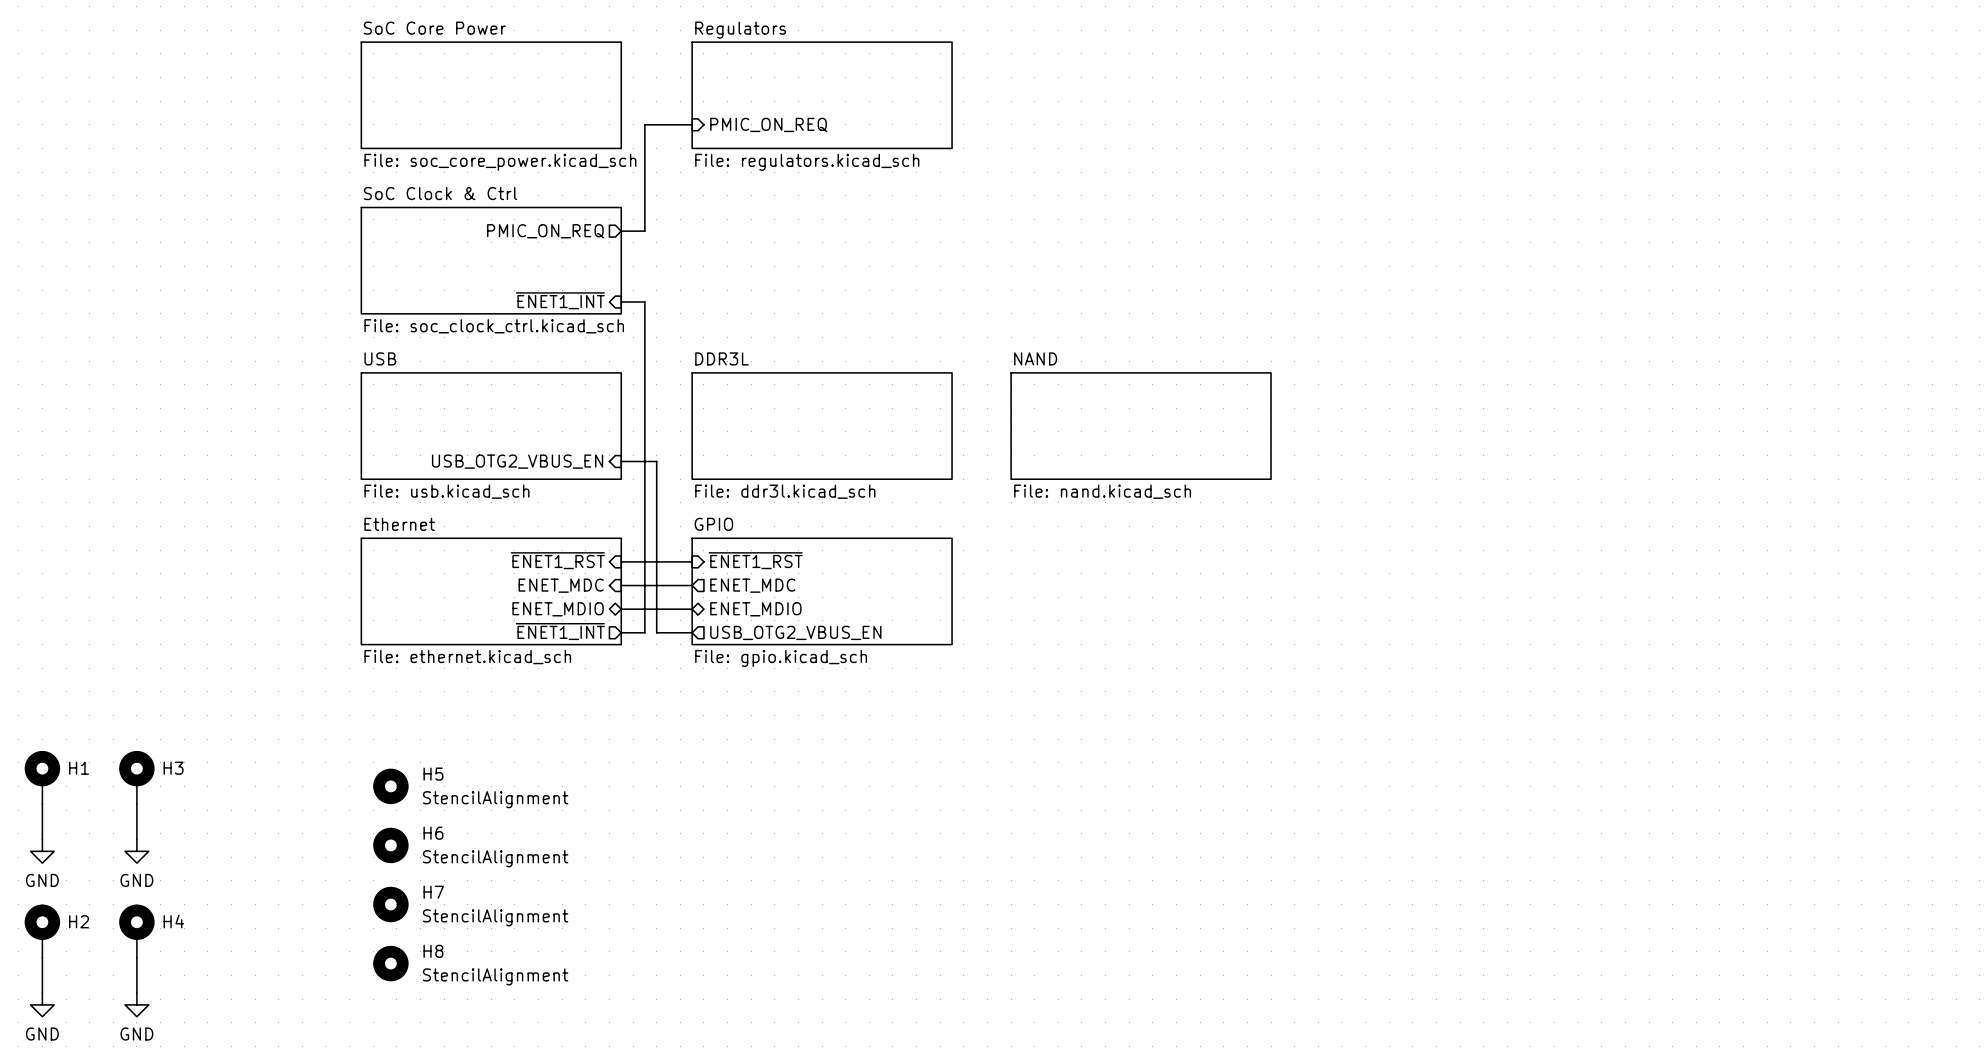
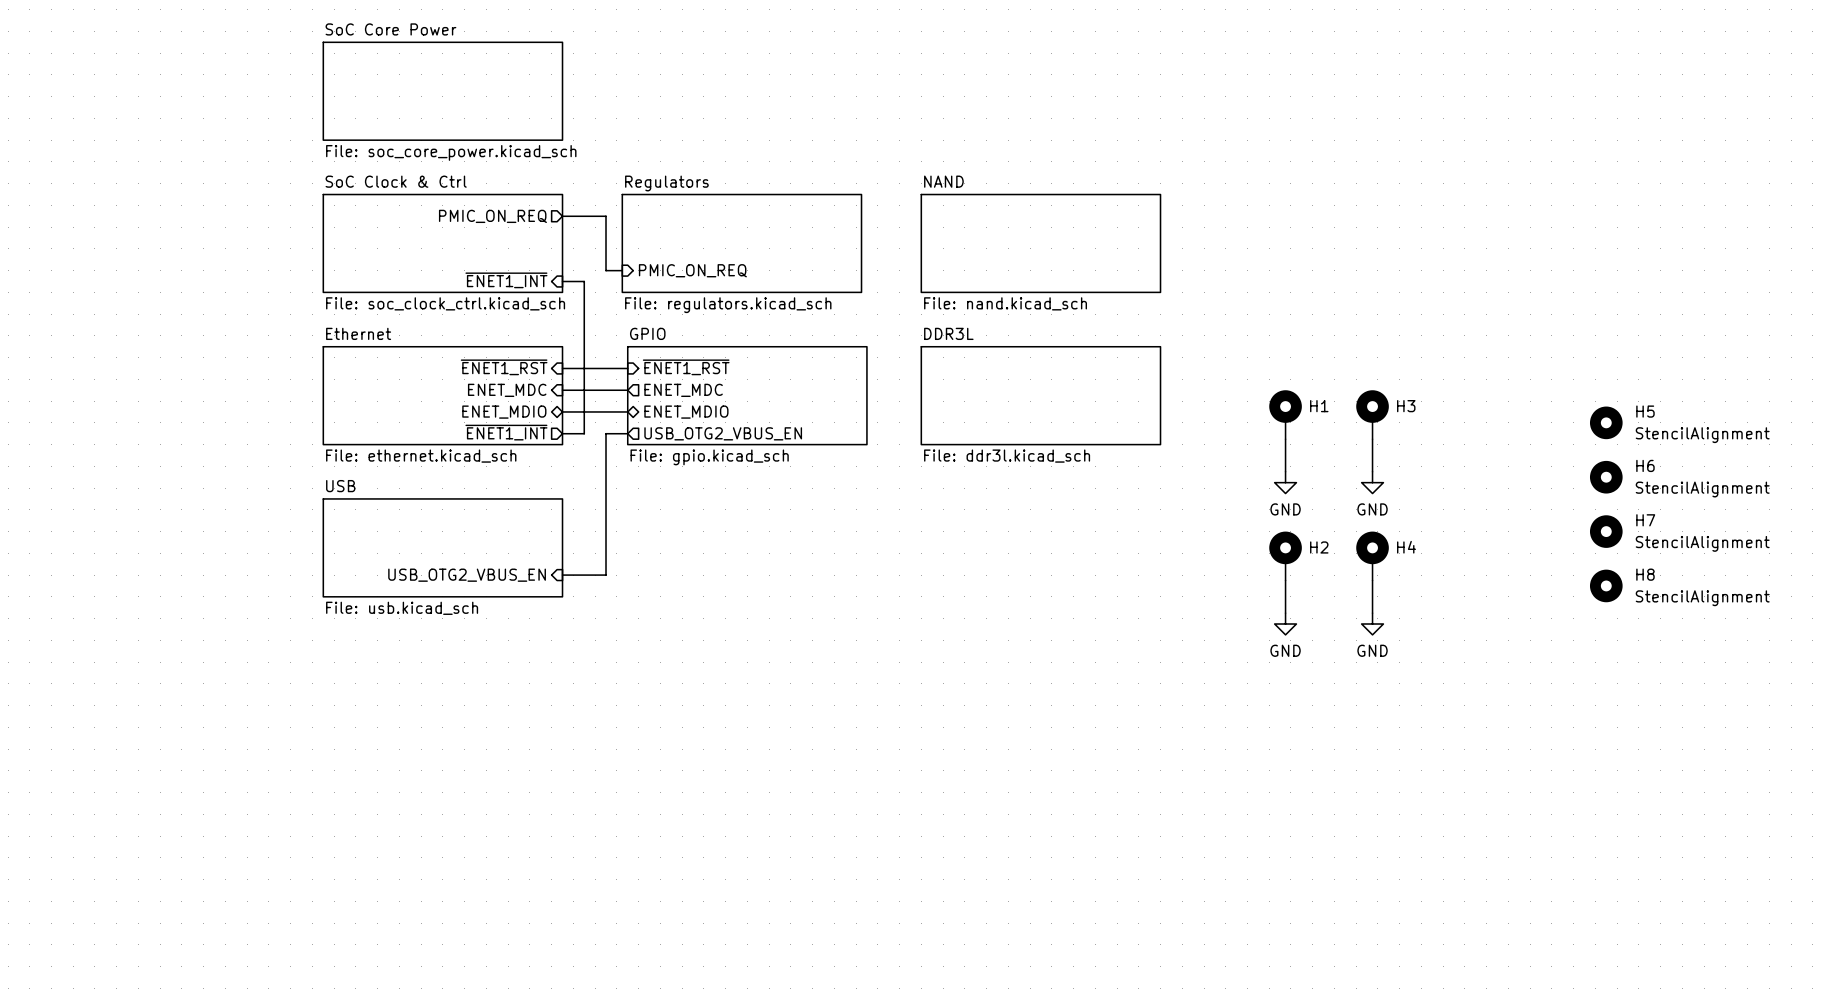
sheet Regulators position: (822, 95) -> (741, 243)
wire: (692, 124) (644, 124) (644, 231) -> (622, 270) (606, 270) (606, 216) (584, 216)
sheet pin position: PMIC_ON_REQ (768, 124) -> PMIC_ON_REQ (692, 270)
sheet NAND: none -> File: nand.kicad_sch (1040, 243)
sheet USB name: USB (380, 358) -> Ethernet (358, 333)
sheet DDR3L name: DDR3L (722, 358) -> GPIO (647, 333)
sheet NAND name: NAND (1035, 358) -> DDR3L (948, 333)
sheet pin: none -> ~{ENET1_RST} (504, 367)
sheet pin: none -> ~{ENET1_RST} (686, 367)
sheet pin: none -> ENET_MDC (507, 390)
sheet pin: none -> ENET_MDC (683, 390)
sheet pin: none -> ENET_MDIO (504, 412)
sheet pin: none -> ENET_MDIO (686, 412)
sheet pin: USB_OTG2_VBUS_EN (517, 461) -> none
wire: (621, 461) (656, 461) (656, 632) (692, 632) -> none
wire: (644, 467) (644, 632) (621, 632) -> (584, 433) (562, 433)
wire: none -> (627, 433) (606, 433) (606, 575) (562, 575)
sheet pin: none -> USB_OTG2_VBUS_EN (723, 433)
wire: none -> (1285, 439) (1285, 471)
wire: none -> (1372, 439) (1372, 471)
sheet USB value: File: usb.kicad_sch (446, 491) -> File: ethernet.kicad_sch (421, 456)
sheet DDR3L value: File: ddr3l.kicad_sch (785, 491) -> File: gpio.kicad_sch (709, 457)
sheet NAND value: File: nand.kicad_sch (1102, 491) -> File: ddr3l.kicad_sch (1007, 456)
power symbol: none -> GND (1285, 482)
power symbol: none -> GND (1372, 482)
sheet Ethernet name: Ethernet (399, 524) -> USB (340, 486)
sheet pin: ~{ENET1_RST} (557, 560) -> none
sheet pin: ~{ENET1_RST} (755, 560) -> none
wire: (621, 561) (692, 561) -> (562, 368) (627, 368)
sheet pin: ENET_MDC (561, 585) -> none
wire: (621, 585) (692, 585) -> (562, 390) (627, 390)
sheet pin: ENET_MDC (752, 585) -> none
sheet GPIO: File: gpio.kicad_sch (822, 591) -> none
sheet pin: ENET_MDIO (558, 609) -> none
wire: (621, 609) (692, 609) -> (562, 411) (627, 411)
sheet pin: ENET_MDIO (755, 609) -> none
sheet pin: none -> USB_OTG2_VBUS_EN (467, 575)
wire: none -> (1285, 580) (1285, 613)
wire: none -> (1372, 580) (1372, 613)
sheet pin position: ~{ENET1_INT} (560, 631) -> ~{ENET1_INT} (506, 432)
sheet pin: USB_OTG2_VBUS_EN (795, 632) -> none
sheet Ethernet value: File: ethernet.kicad_sch (467, 657) -> File: usb.kicad_sch (402, 608)
power symbol: none -> GND (1285, 624)
power symbol: none -> GND (1372, 624)
H1 position: (42, 777) -> (1285, 414)
H3 position: (136, 777) -> (1372, 414)
H5 position: (390, 786) -> (1606, 422)
wire: (42, 804) (42, 839) -> none
wire: (136, 804) (136, 839) -> none
H6 position: (390, 845) -> (1606, 477)
power symbol: GND (42, 851) -> none
power symbol: GND (136, 851) -> none
H7 position: (390, 904) -> (1606, 531)
H2 position: (42, 931) -> (1285, 556)
H4 position: (136, 931) -> (1372, 556)
wire: (42, 957) (42, 993) -> none
wire: (136, 957) (136, 993) -> none
H8 position: (390, 963) -> (1606, 585)
power symbol: GND (42, 1004) -> none
power symbol: GND (136, 1004) -> none

